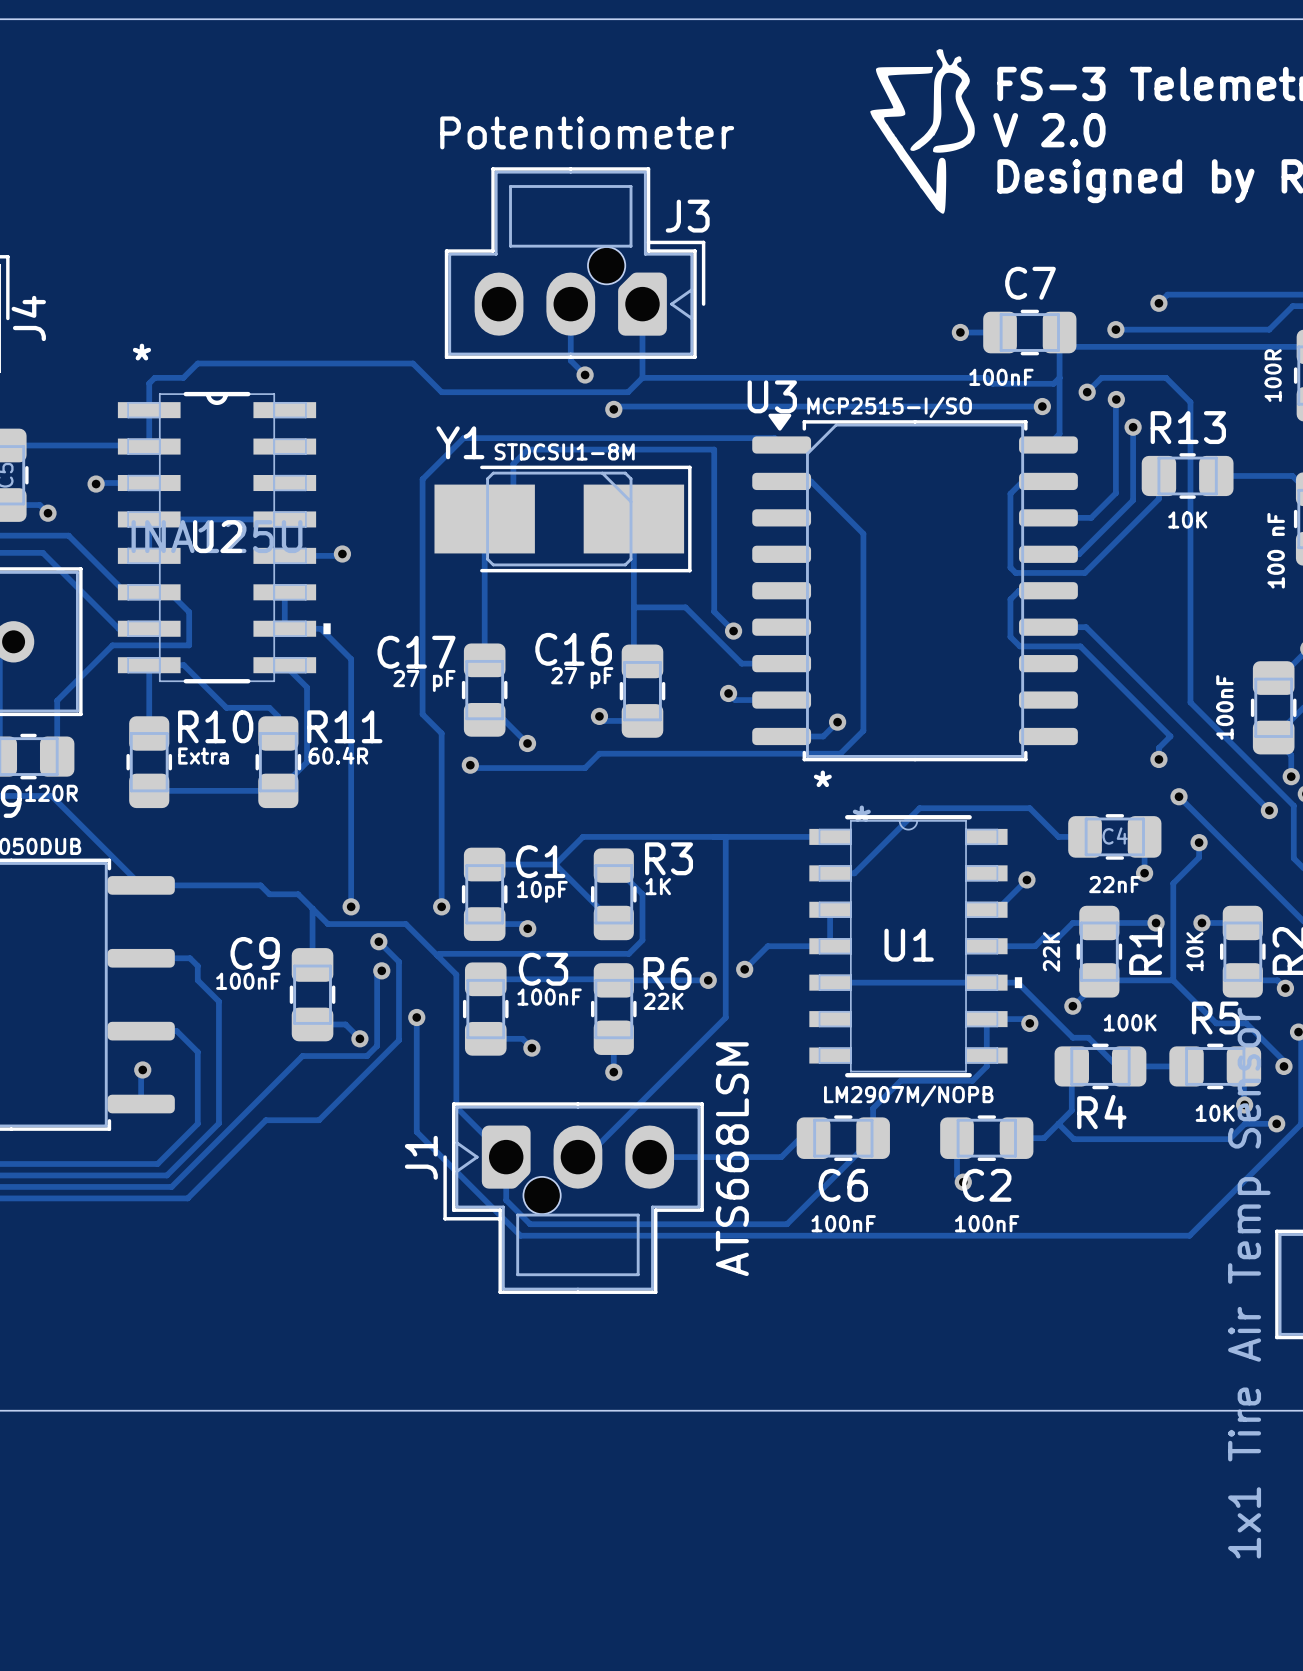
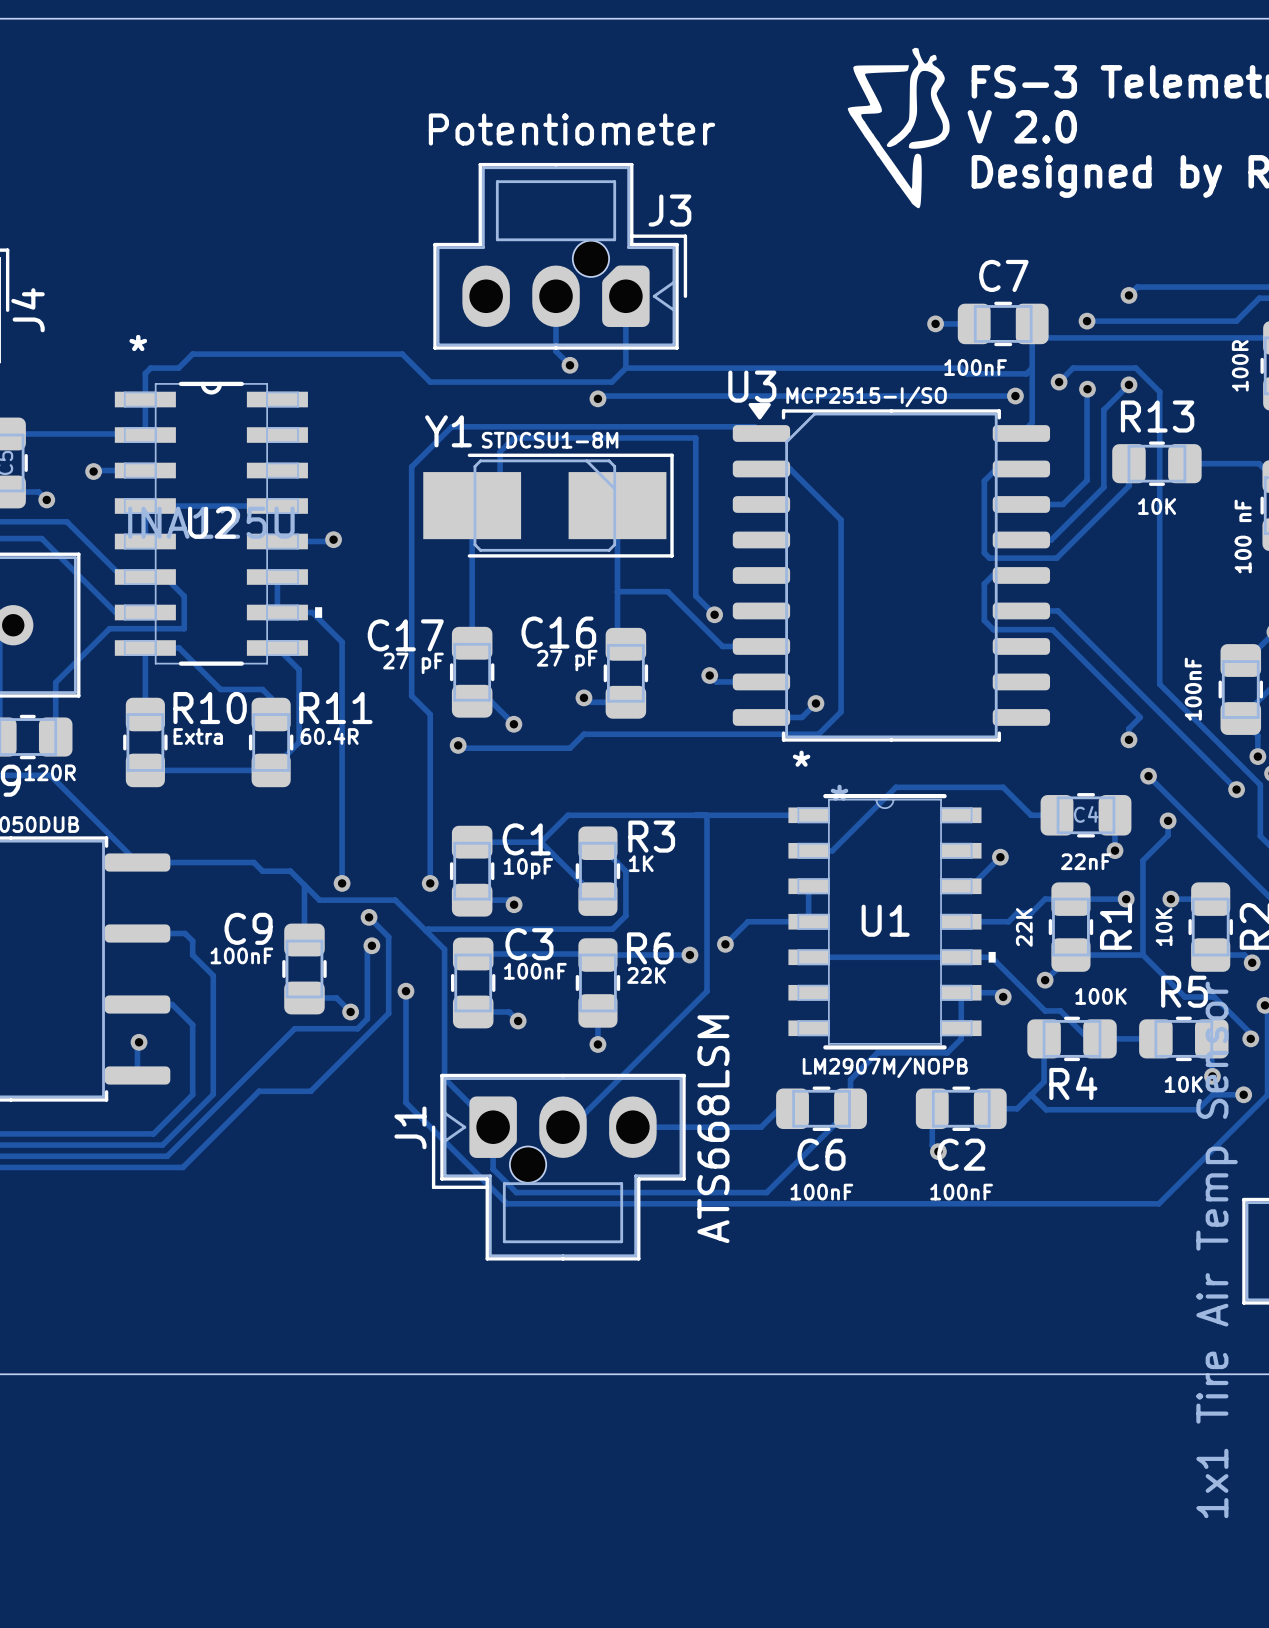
track: none -> (1128, 384) (1103, 410) (1103, 416)
via position: (1133, 427) -> (1128, 384)

